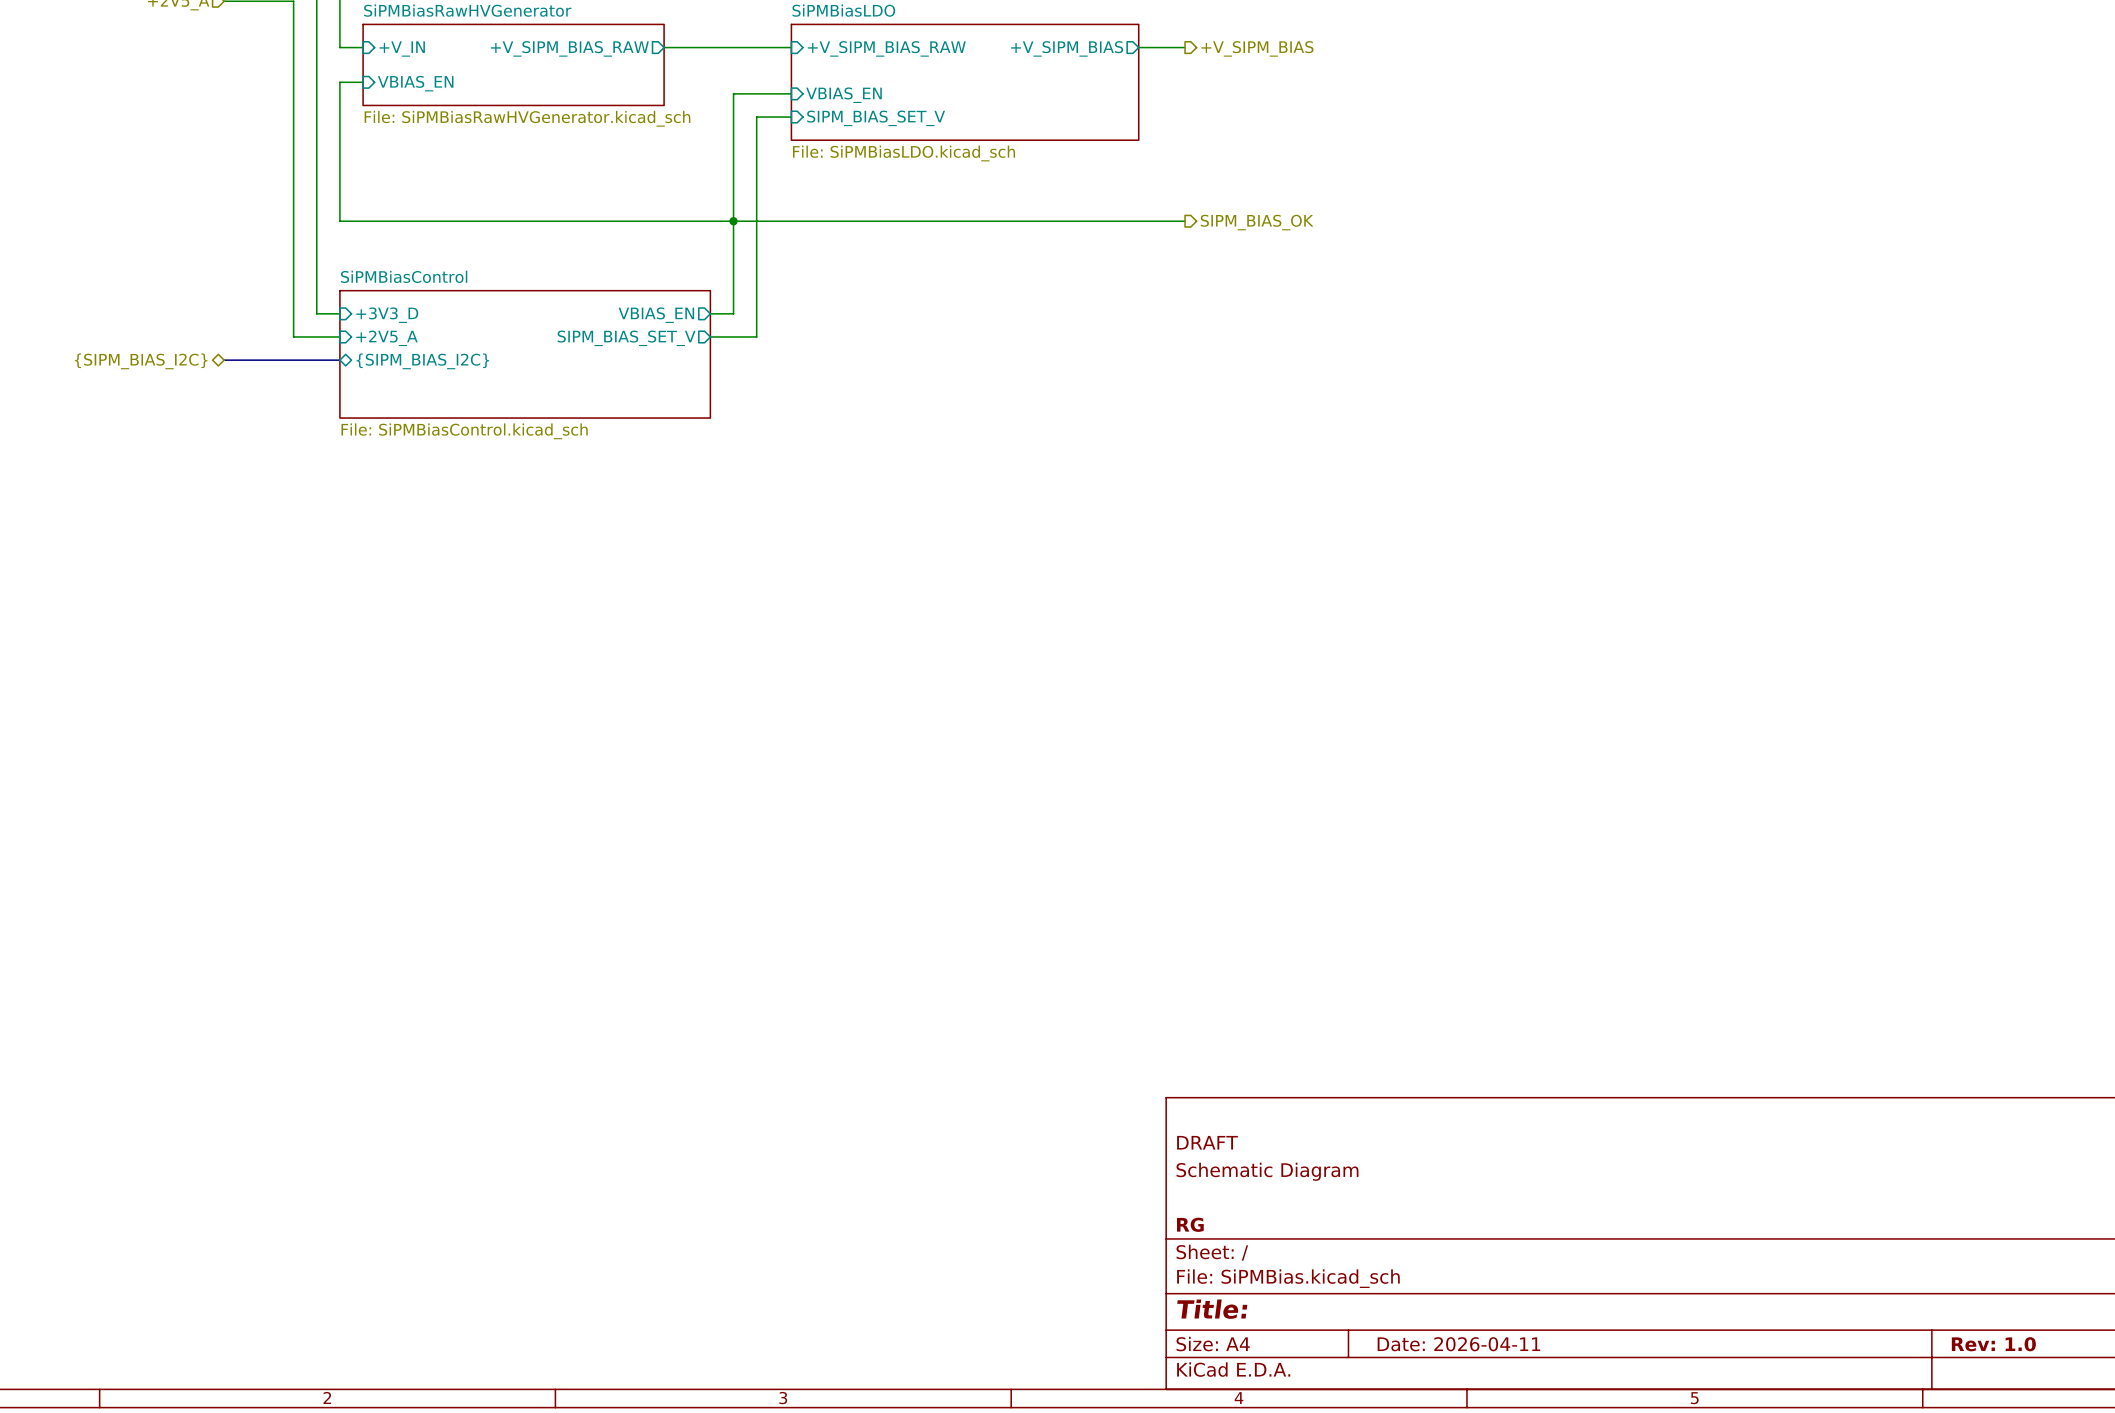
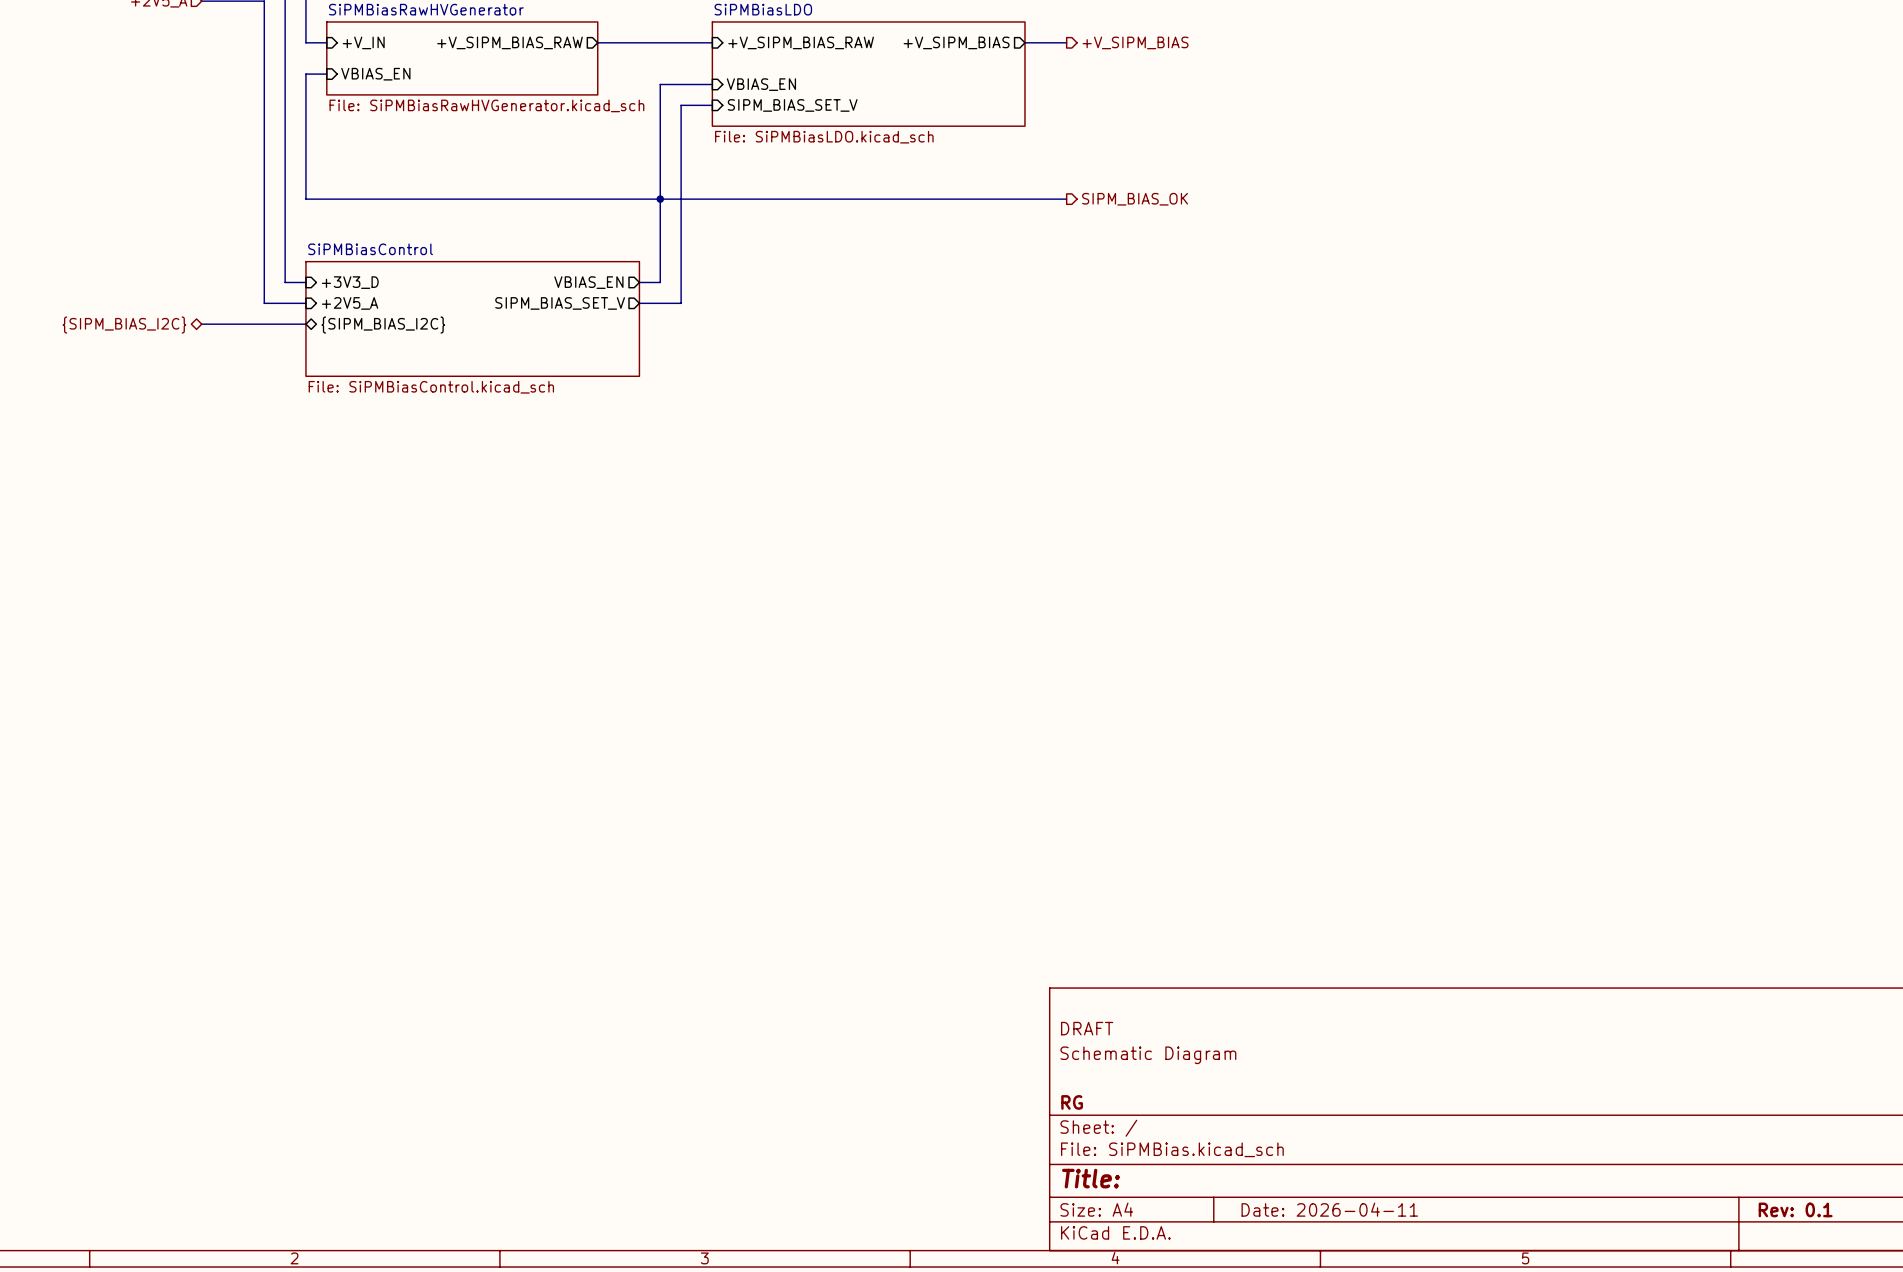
title block: Rev: 1.0 (1993, 1344) -> Rev: 0.1 (1795, 1209)

